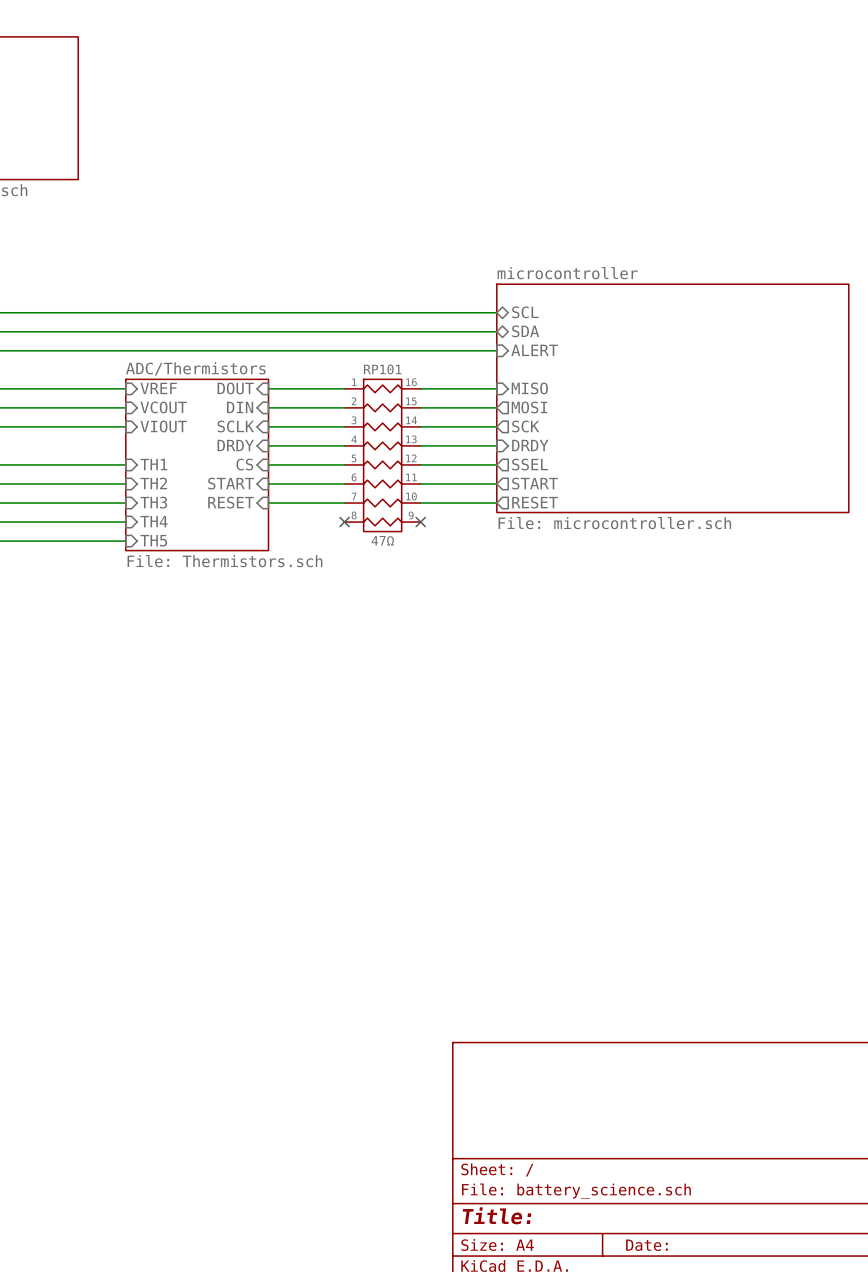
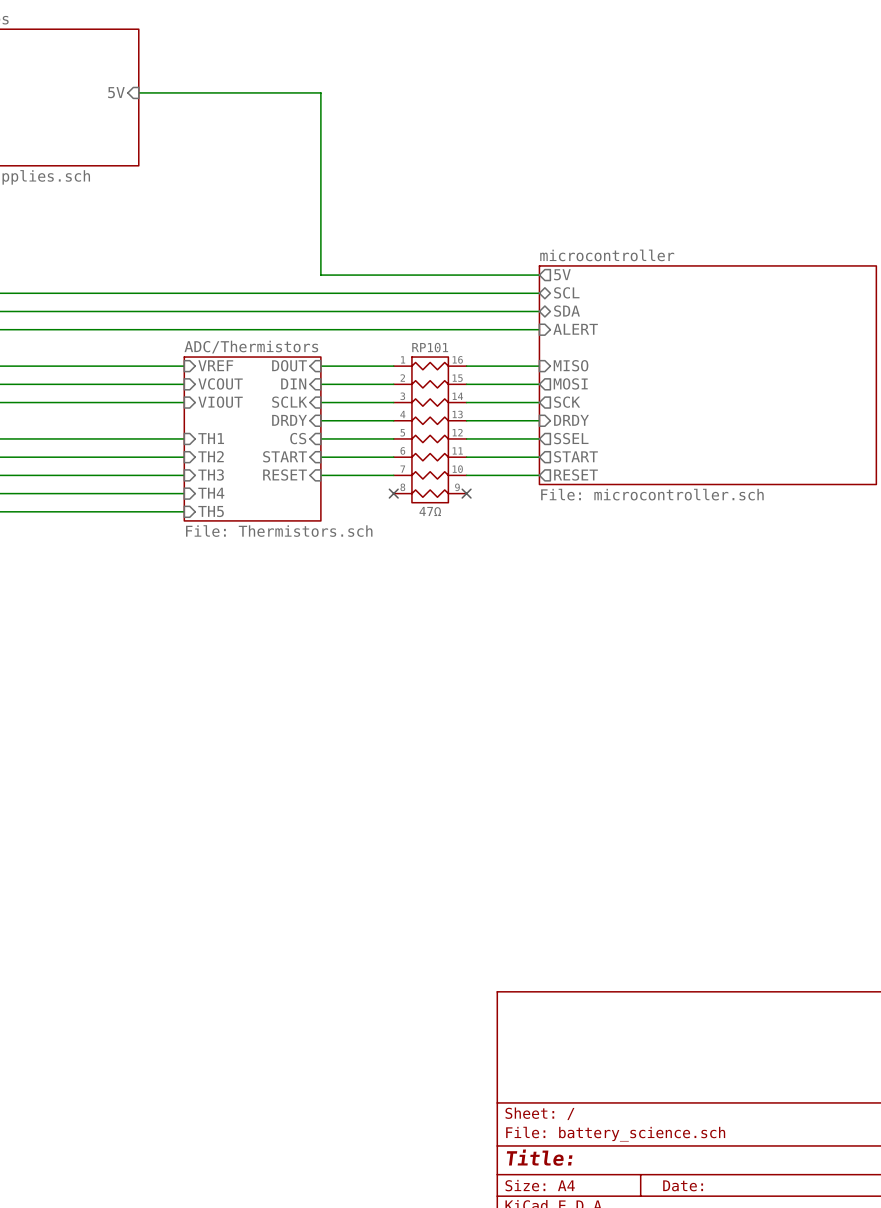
sheet pin: none -> 5V (116, 92)
wire: none -> (138, 92) (320, 92) (320, 275) (539, 275)
sheet pin: none -> 5V (562, 274)

